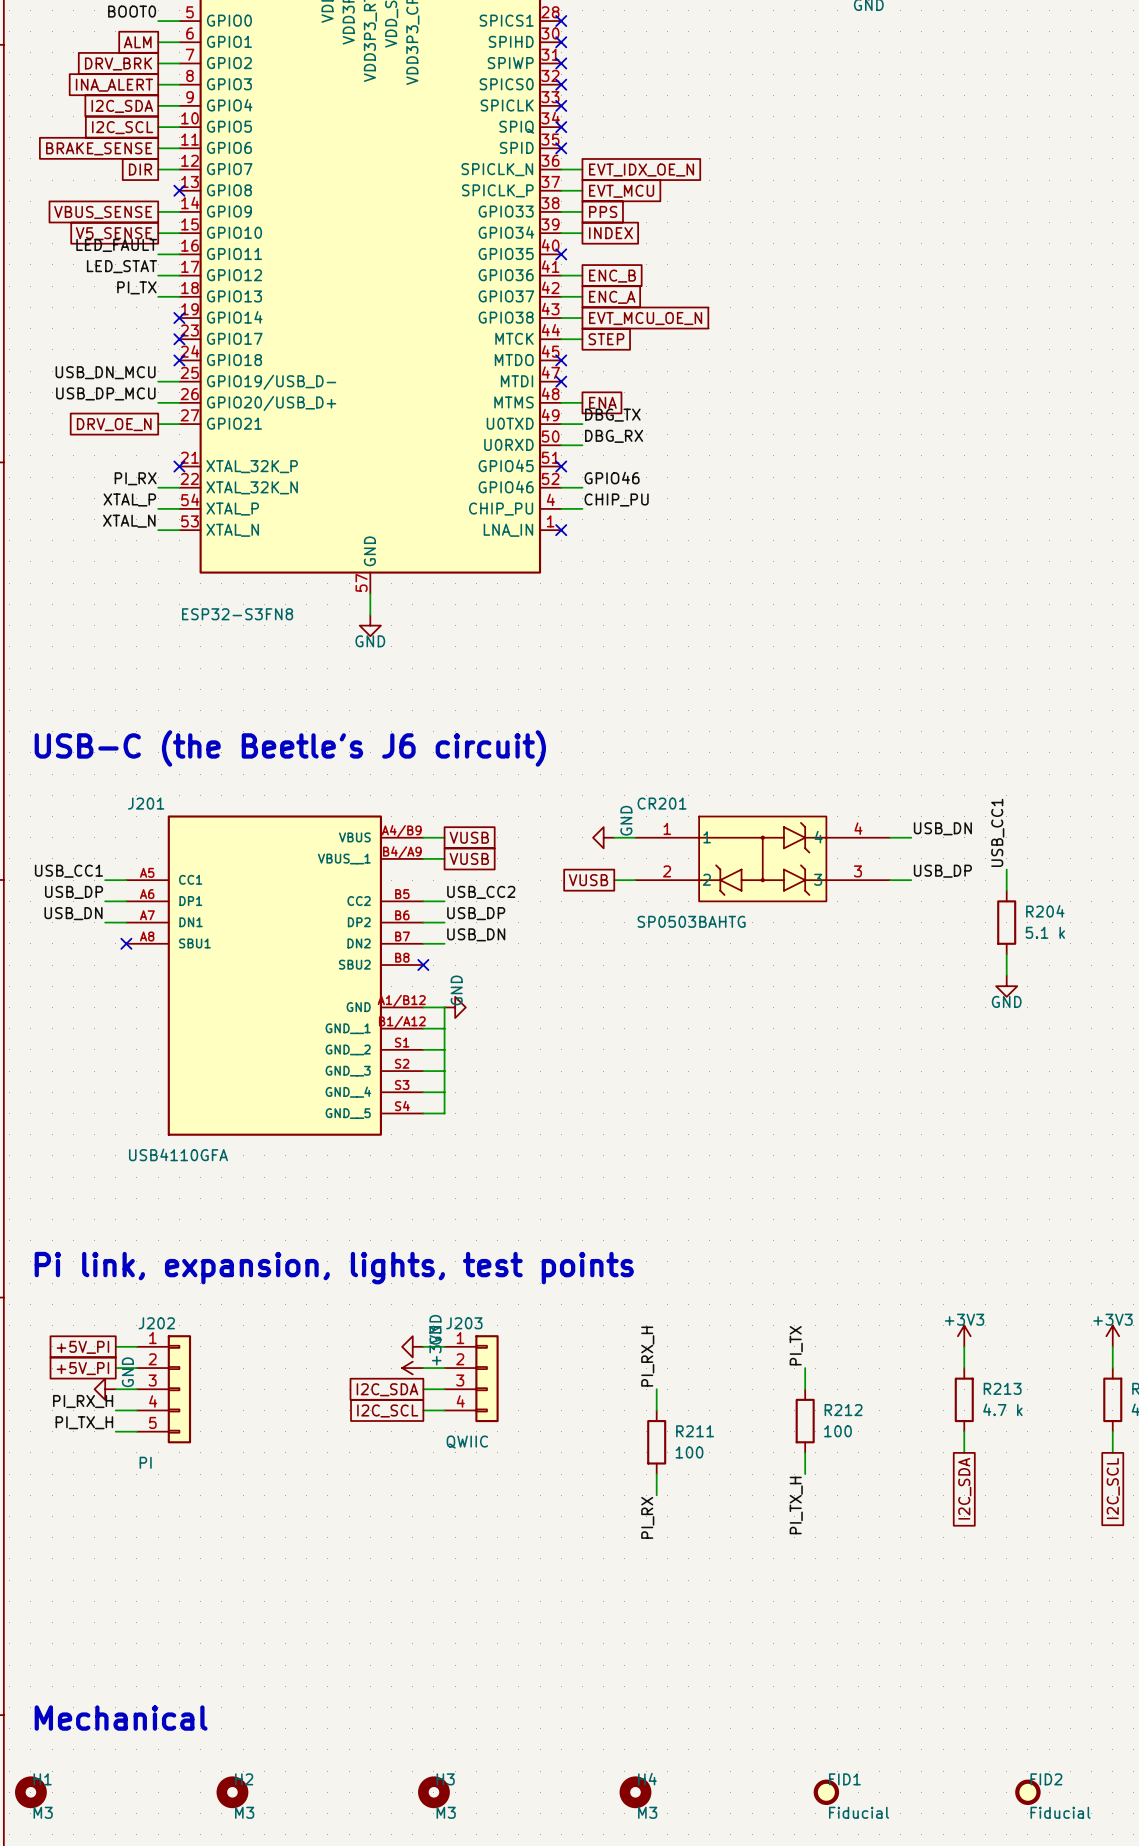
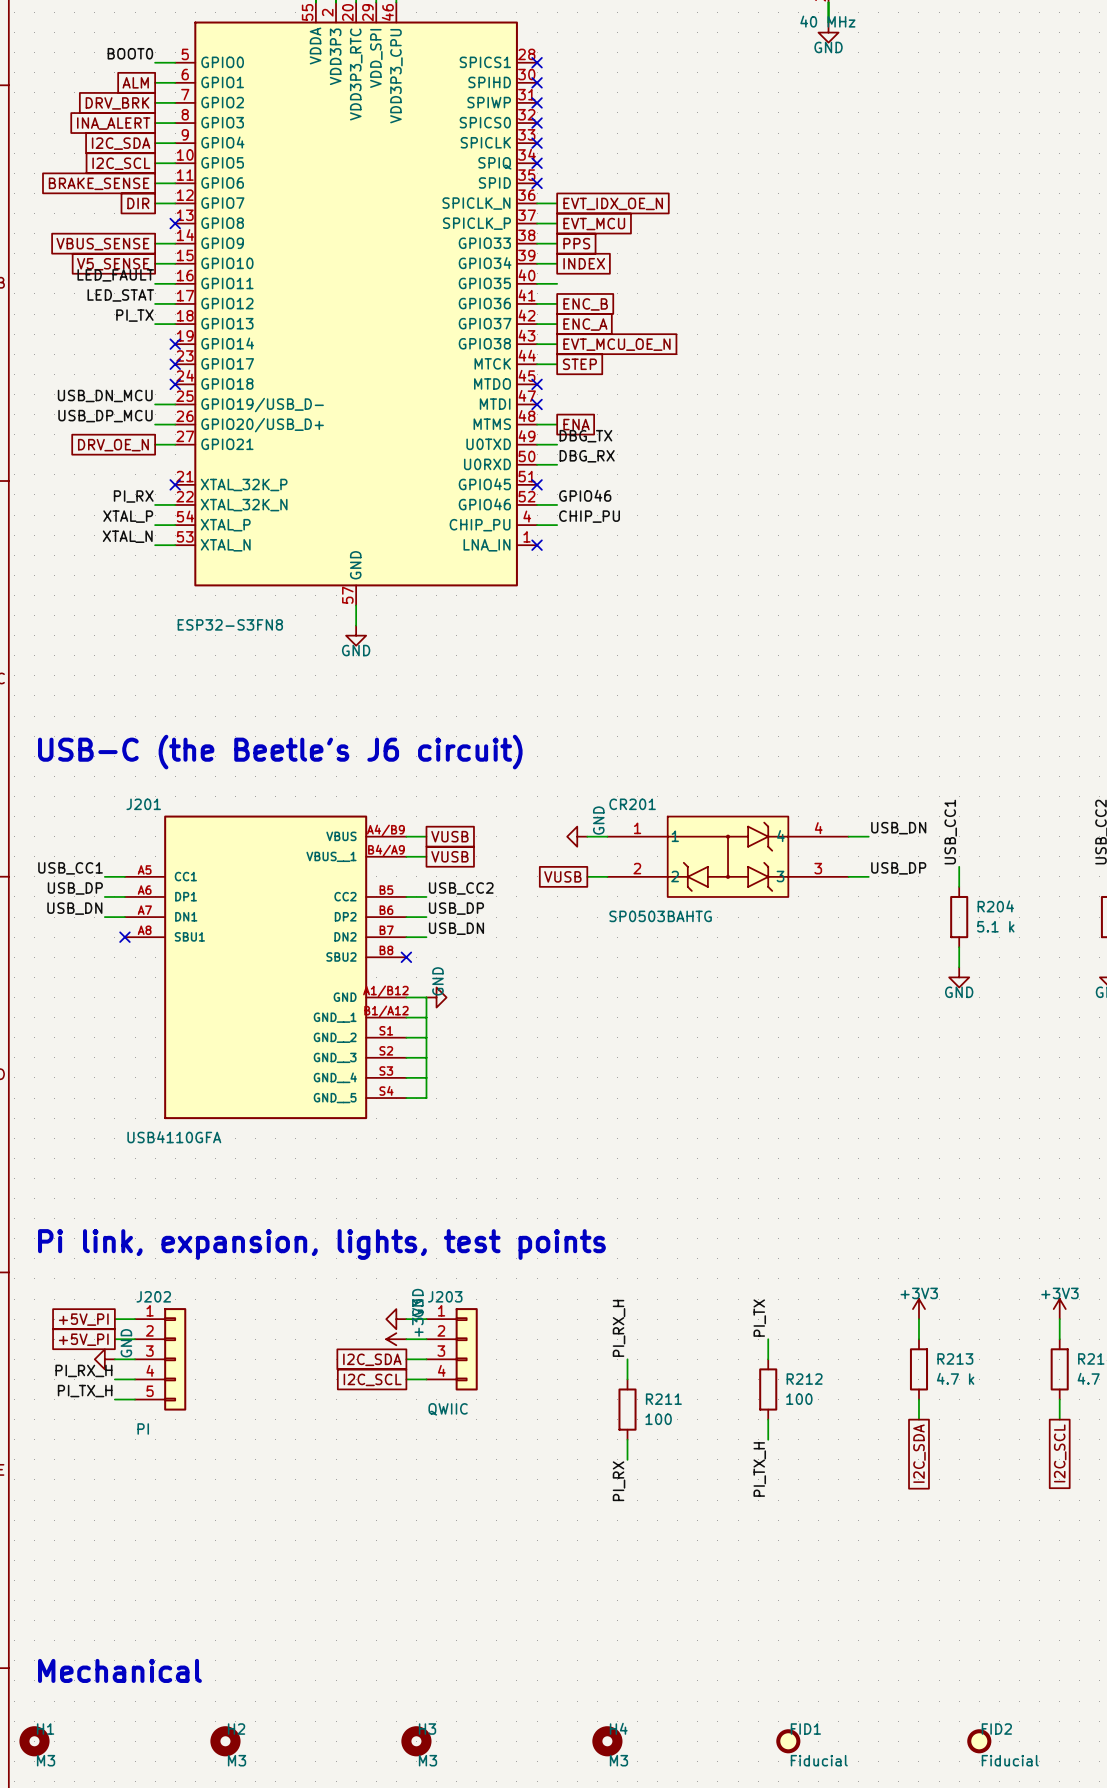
wire: none -> (537, 283) (557, 283)
no-connect mark: (561, 254) -> none

